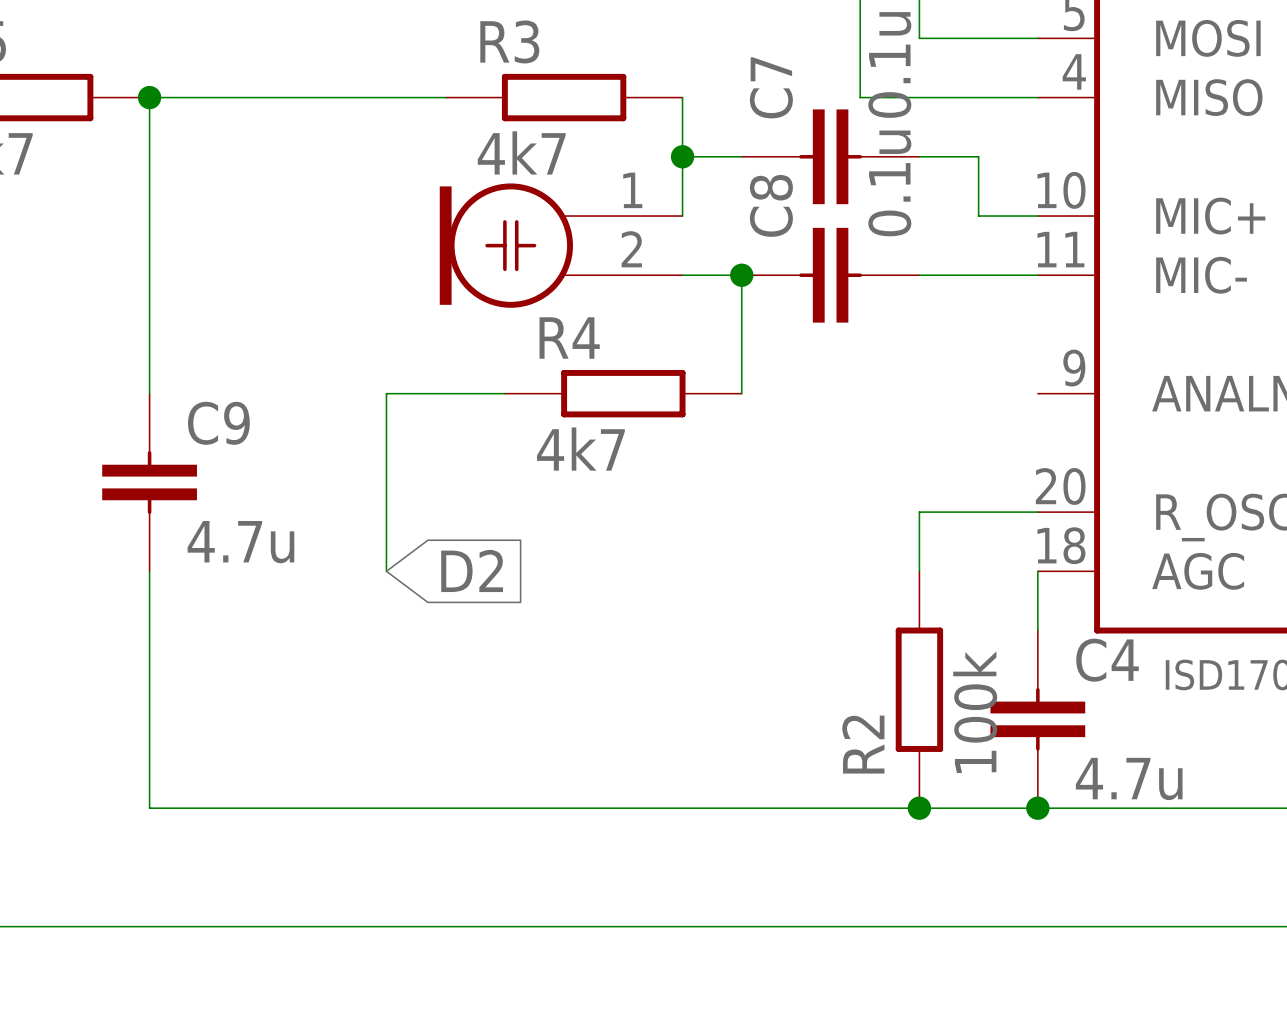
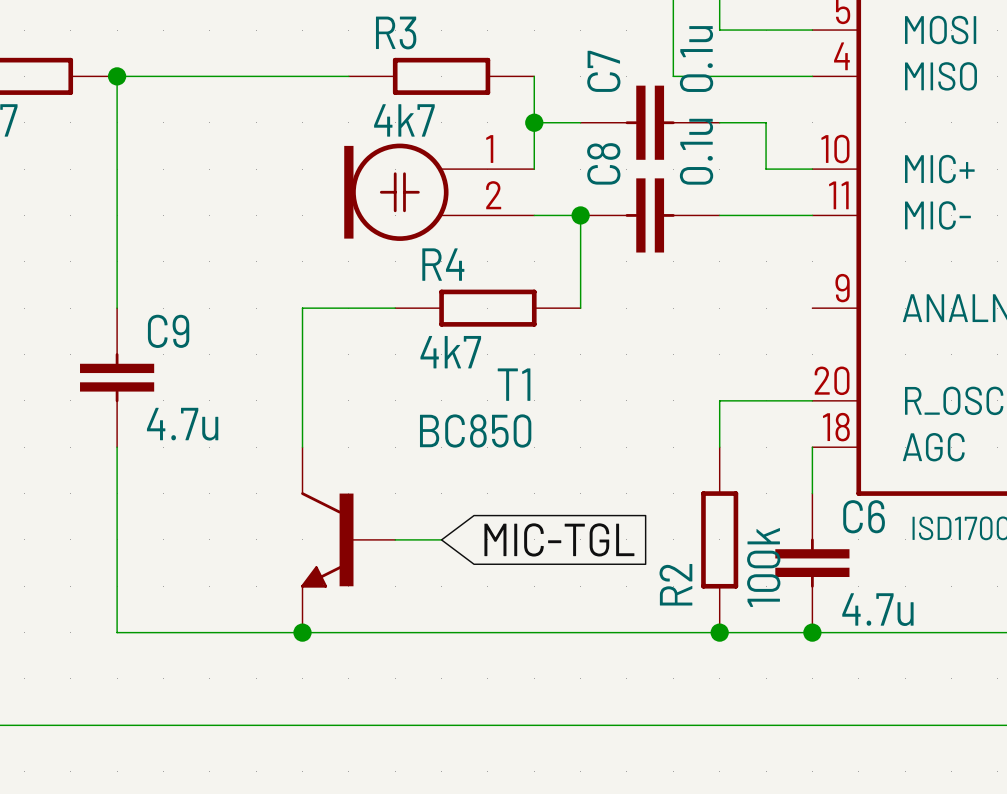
global label: D2 (472, 570) -> none
C4 name: C4 (1107, 660) -> C6 (864, 516)
T1: none -> BC850 (348, 539)
wire: none -> (395, 539) (441, 539)
global label: none -> MIC-TGL (559, 539)
junction: none -> (302, 632)

